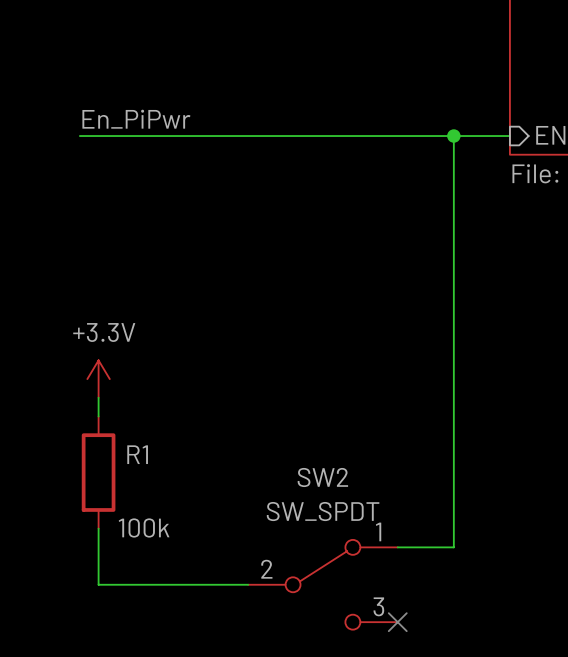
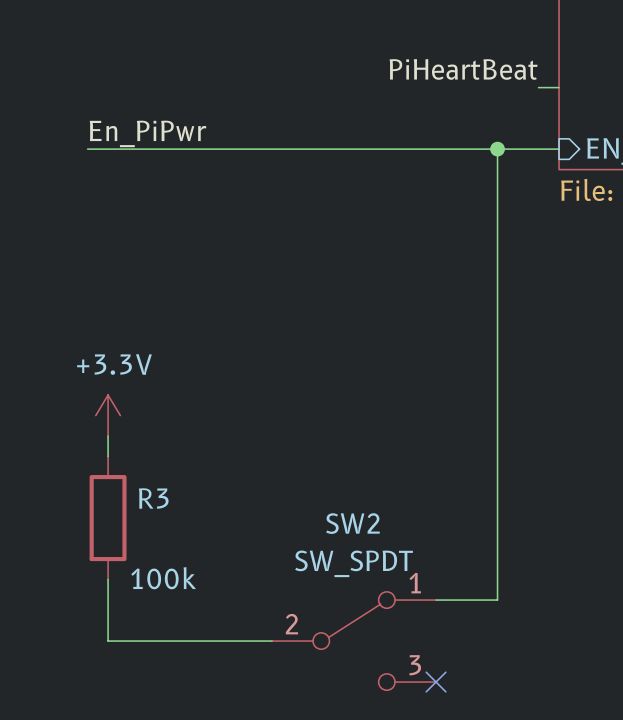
label: none -> PiHeartBeat (463, 69)
wire: none -> (538, 87) (559, 87)
R1 name: R1 (137, 454) -> R3 (153, 498)

